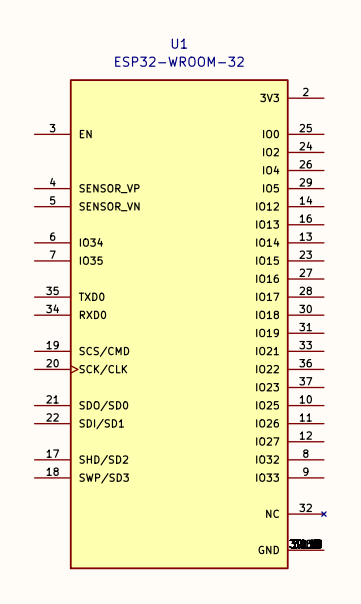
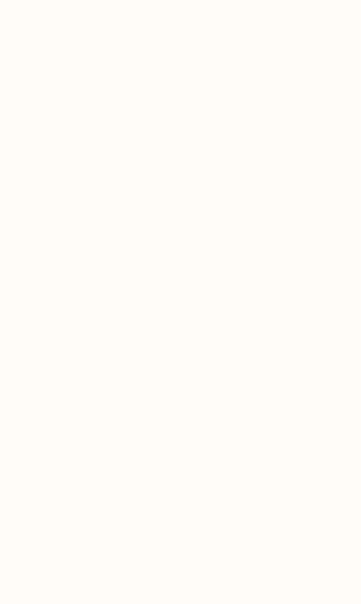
U1: ESP32-WROOM-32 (180, 324) -> none

